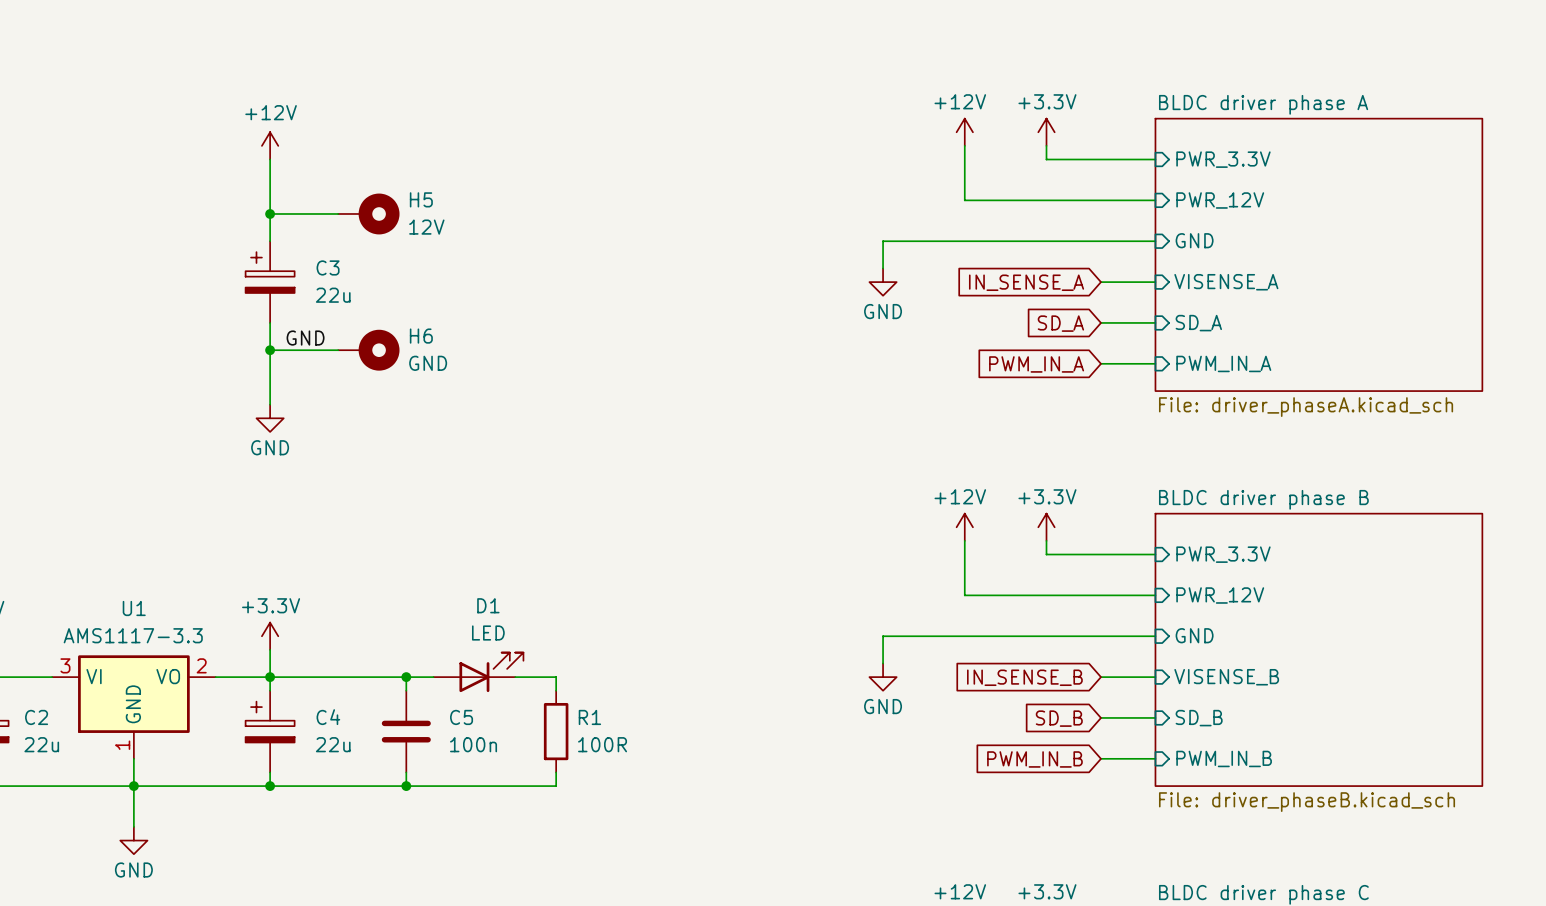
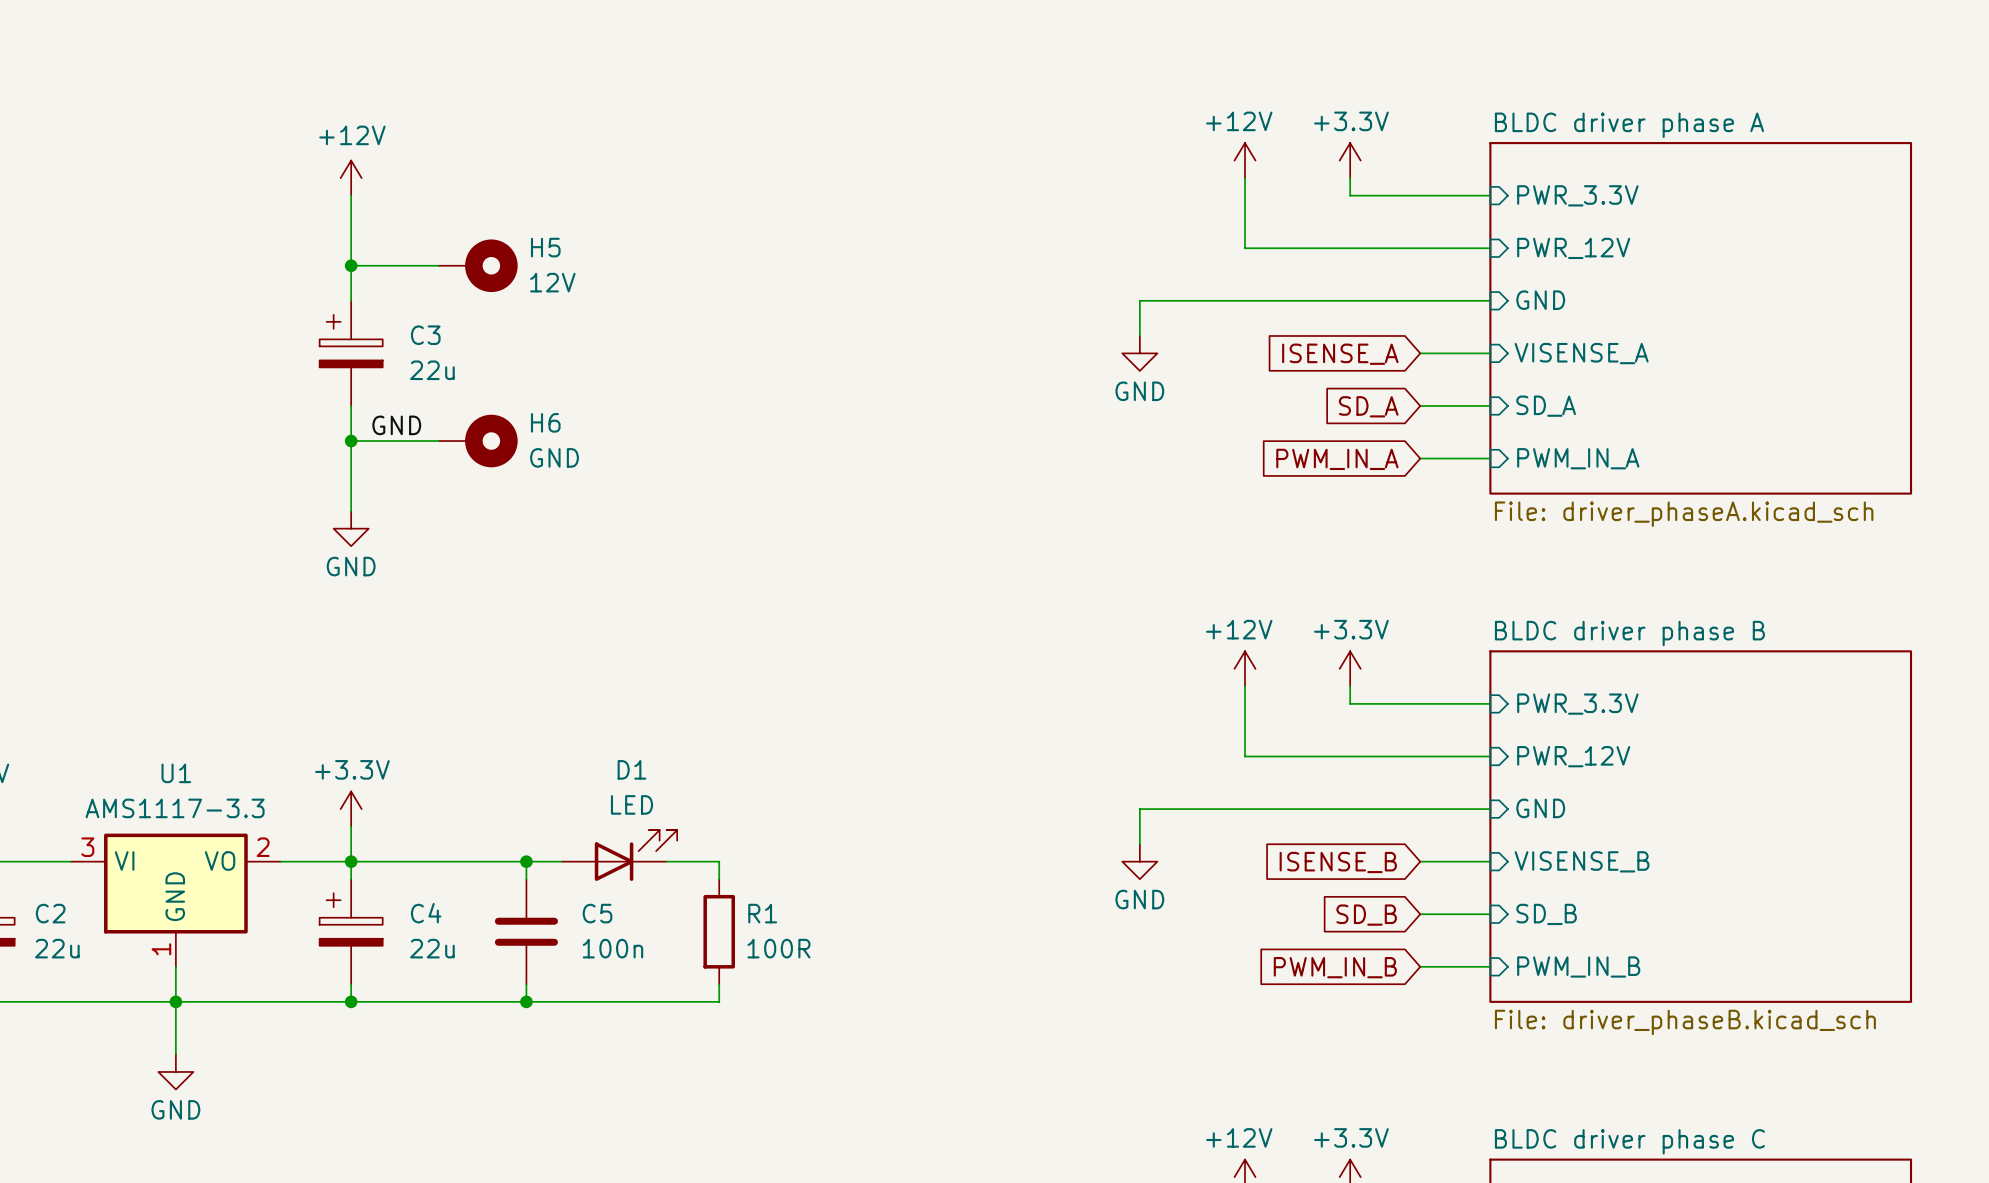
global label: IN_SENSE_A (1026, 282) -> ISENSE_A (1340, 354)
global label: IN_SENSE_B (1024, 677) -> ISENSE_B (1338, 862)

